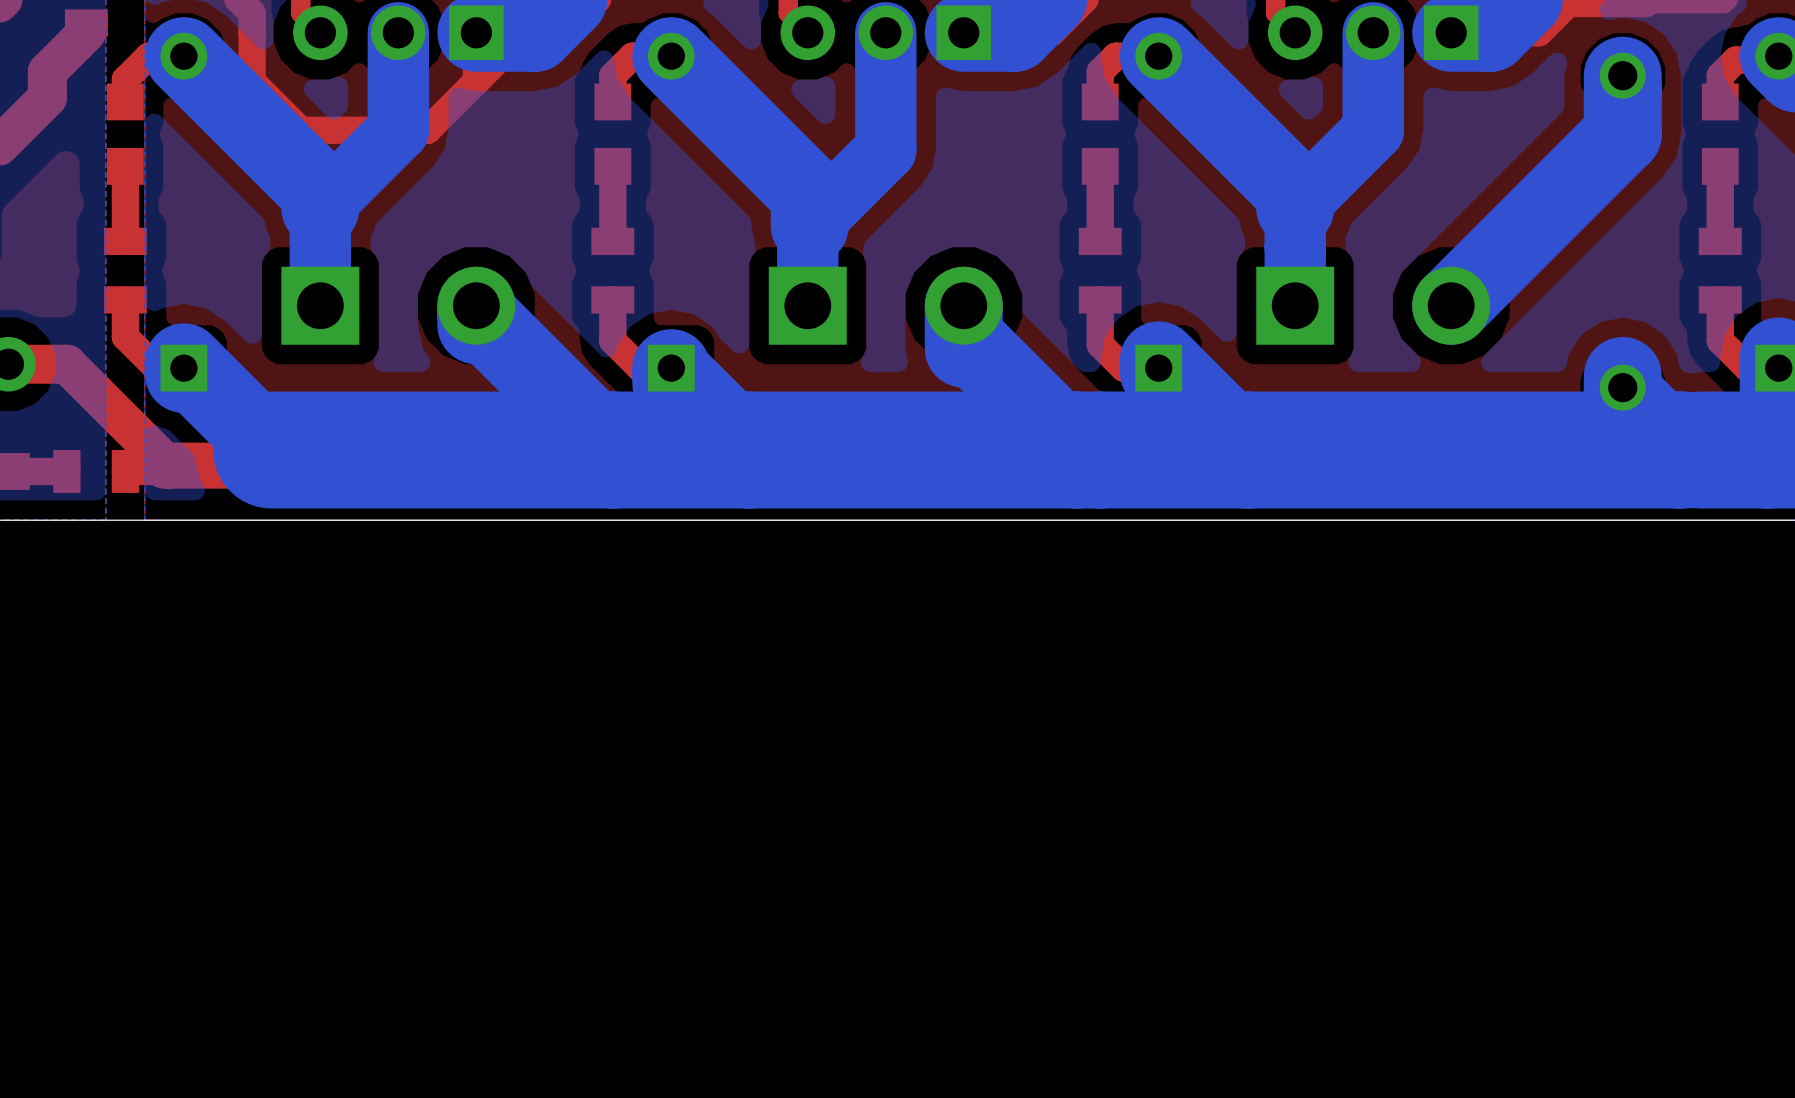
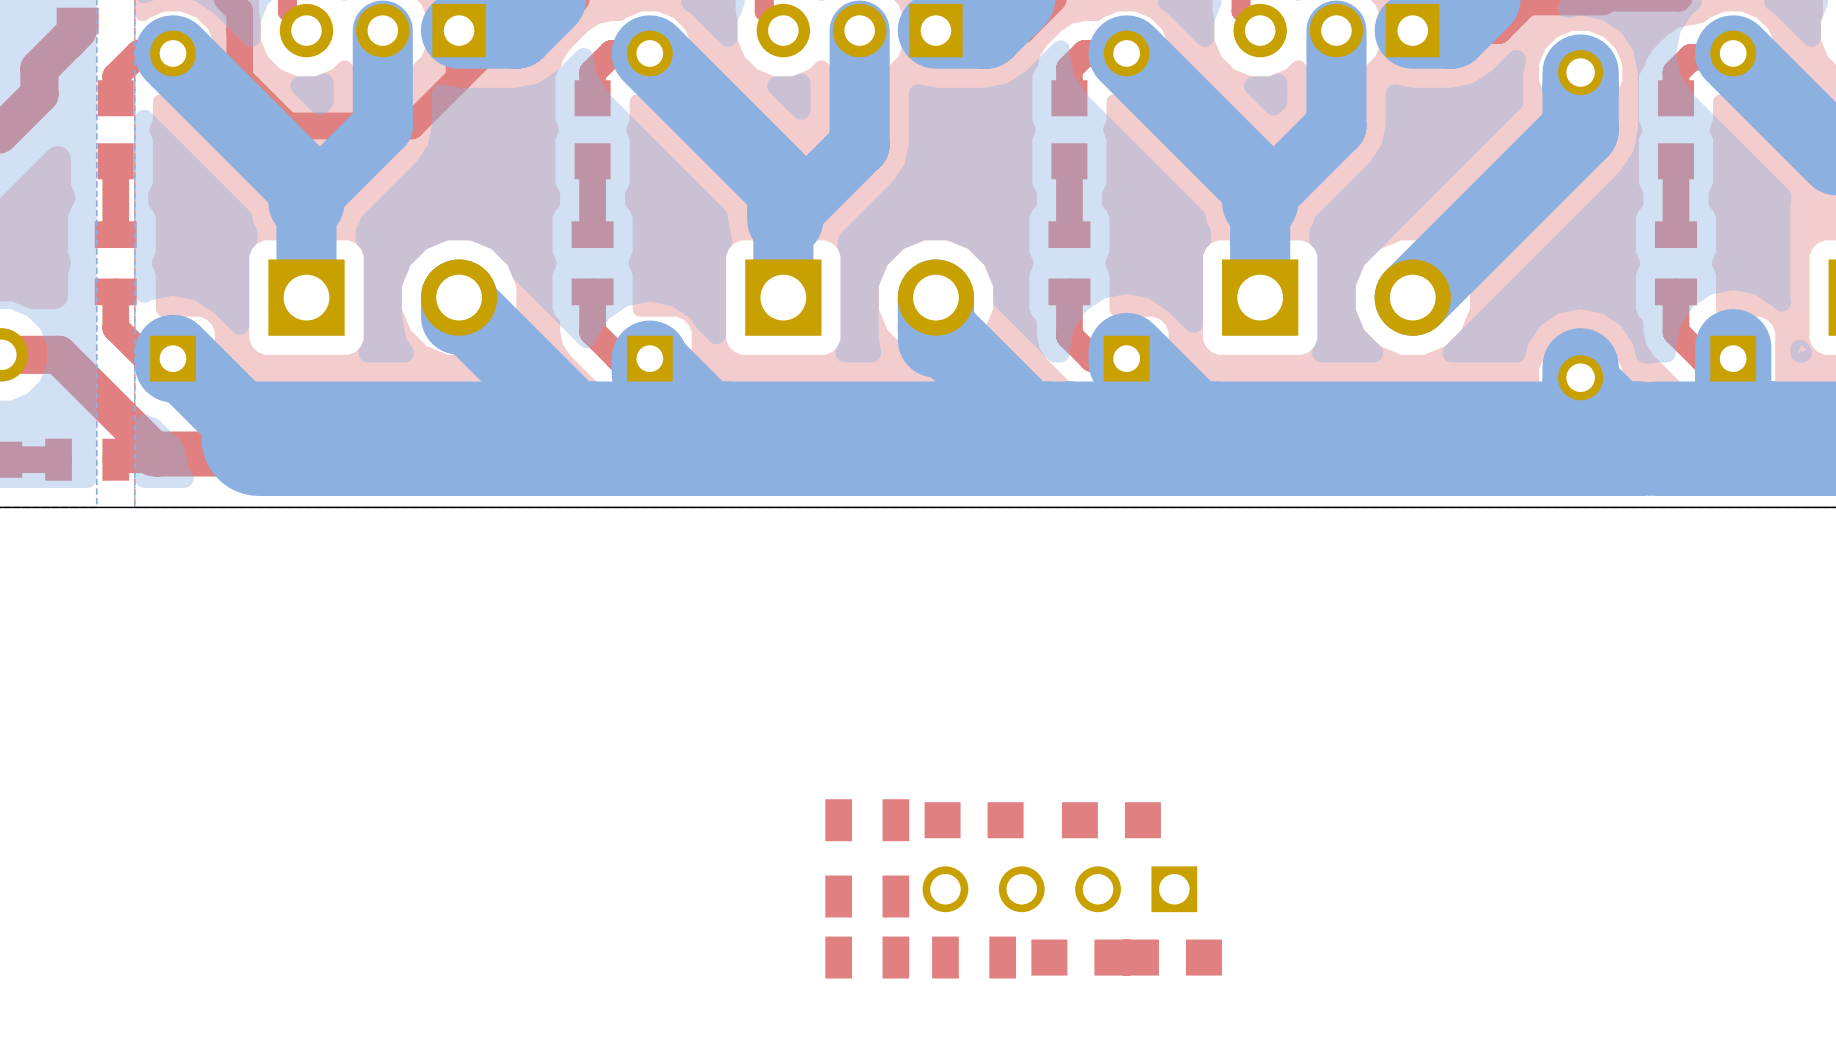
part: none -> (867, 820)
part: none -> (974, 820)
part: none -> (1111, 820)
part: none -> (1059, 889)
part: none -> (867, 896)
part: none -> (867, 957)
part: none -> (974, 957)
part: none -> (1080, 957)
part: none -> (1172, 957)

